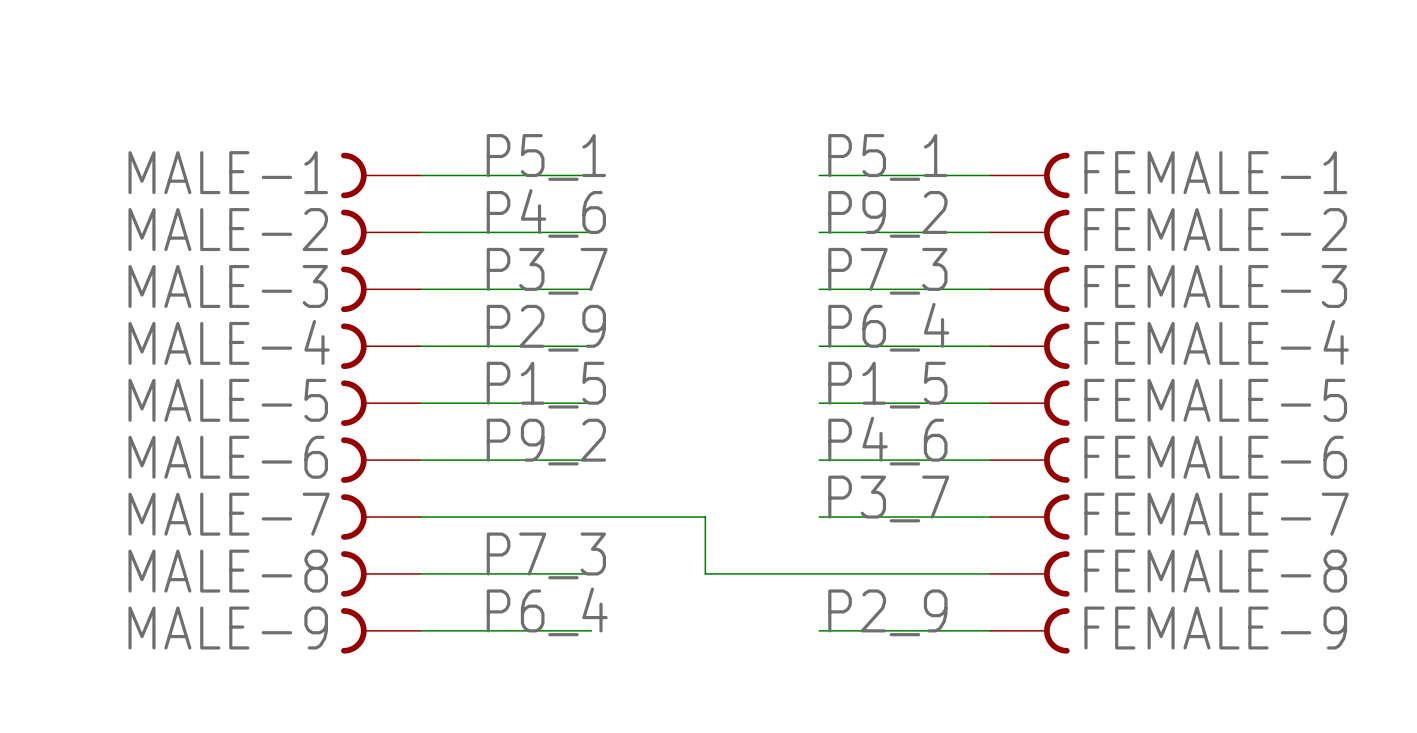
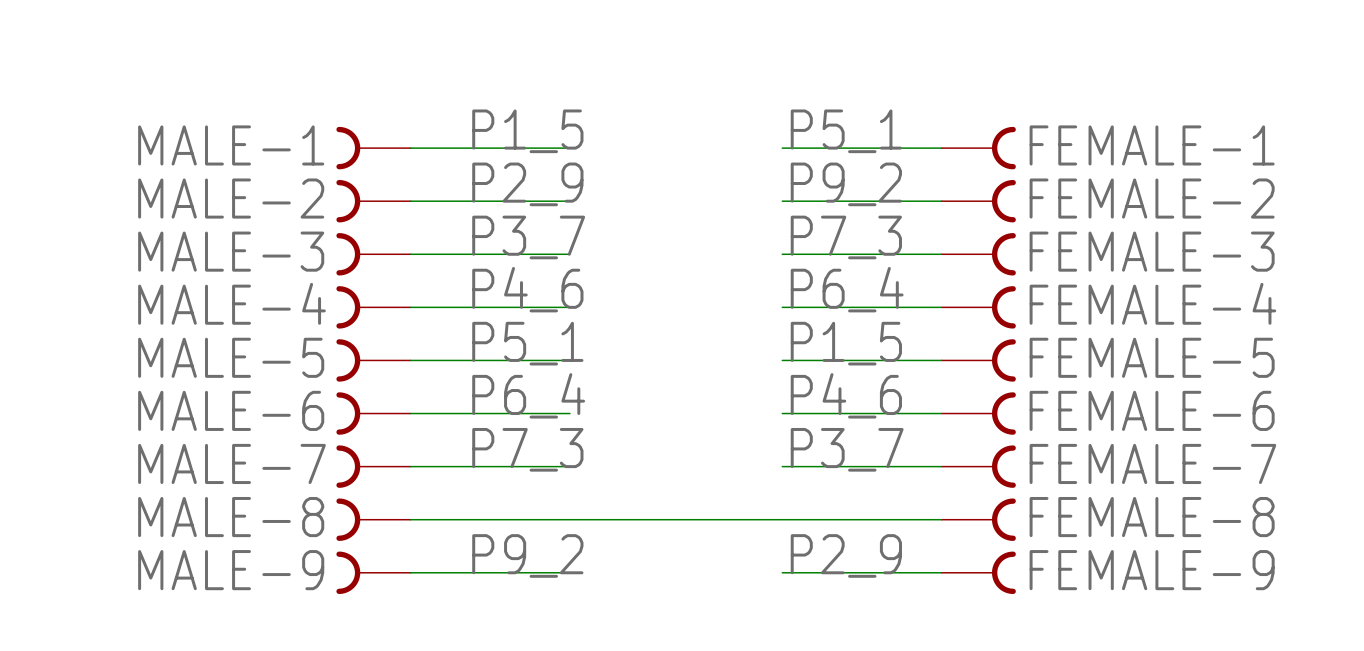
label: P5_1 (546, 157) -> P1_5 (527, 131)
label: P4_6 (546, 213) -> P2_9 (527, 184)
label: P2_9 (546, 328) -> P4_6 (527, 289)
label: P1_5 (546, 385) -> P5_1 (527, 343)
label: P9_2 (546, 442) -> P6_4 (528, 395)
wire: (591, 517) (705, 517) (705, 573) -> (569, 519) (676, 519)
label position: P7_3 (546, 555) -> P7_3 (527, 449)
label: P6_4 (547, 611) -> P9_2 (527, 555)

